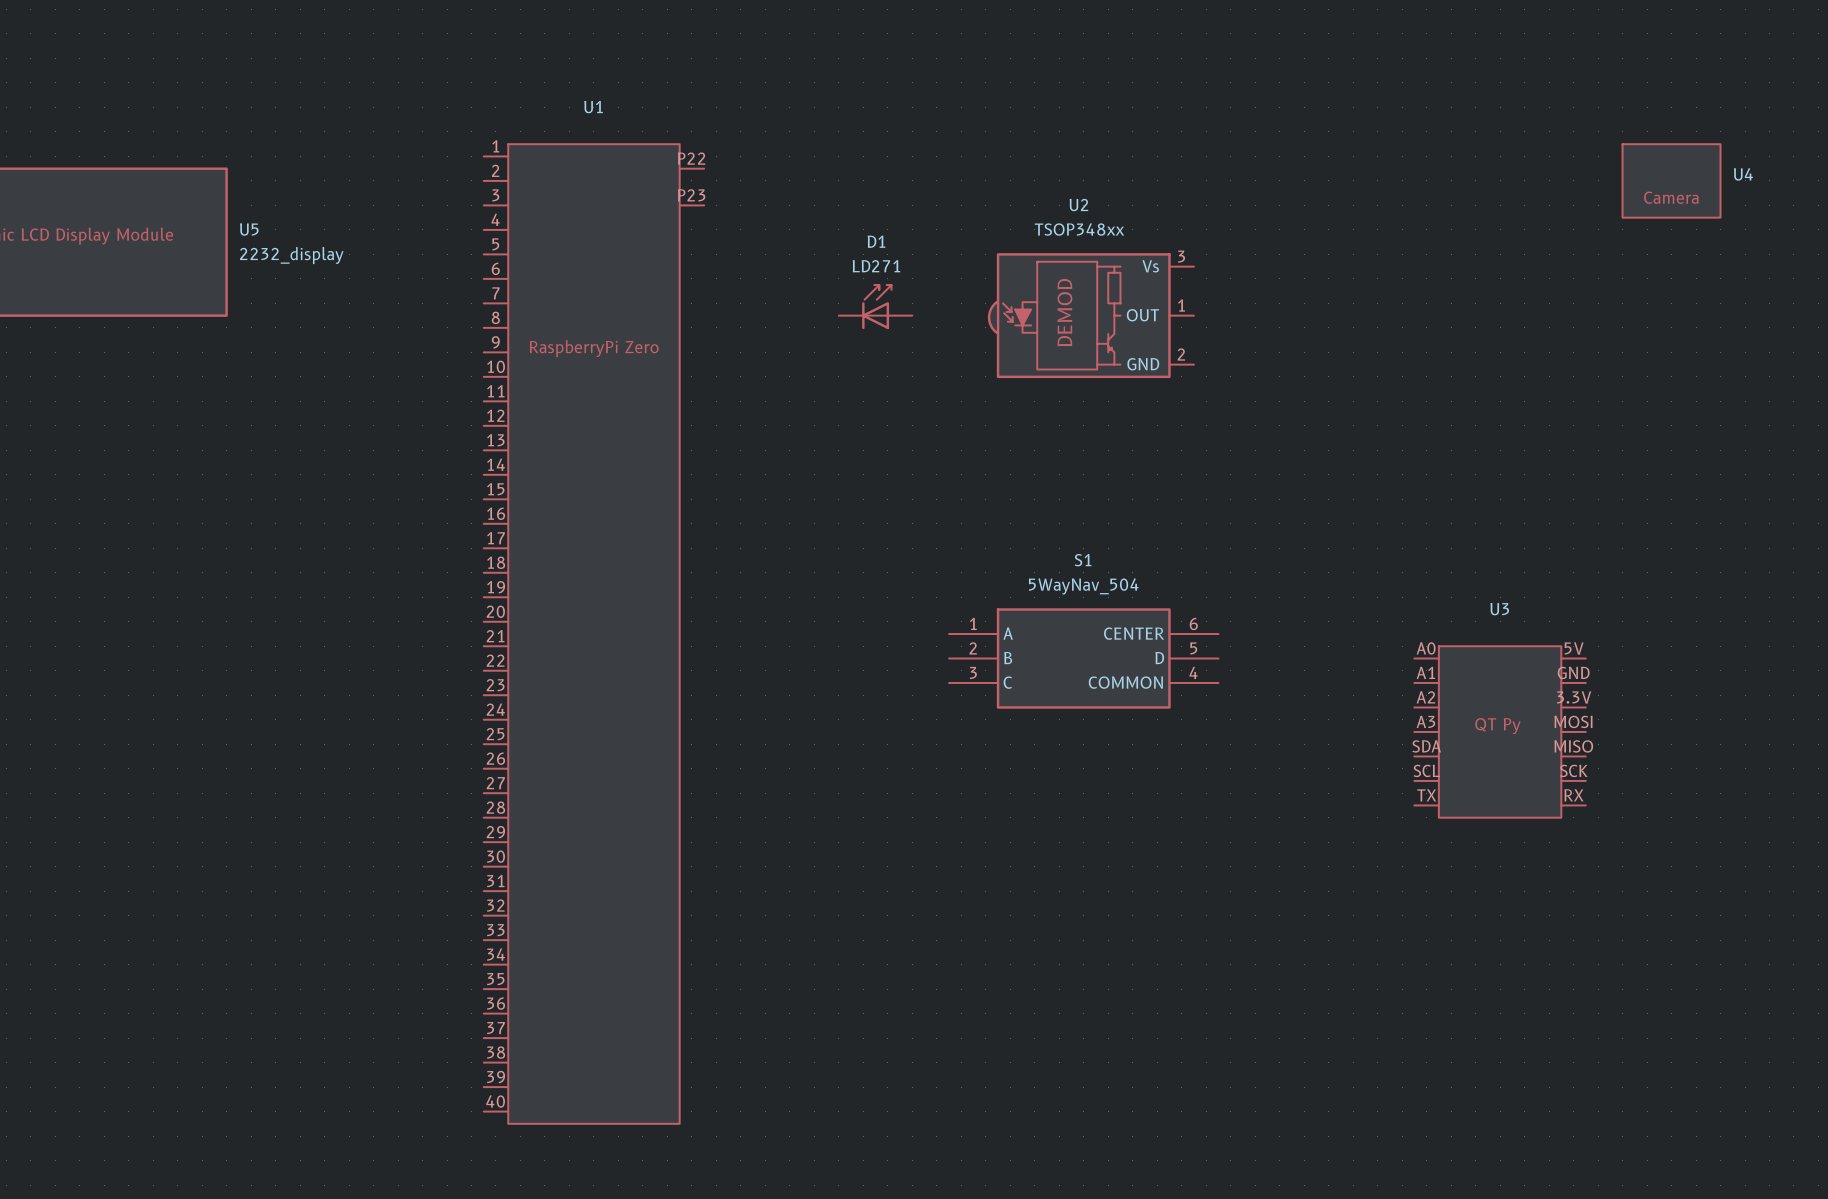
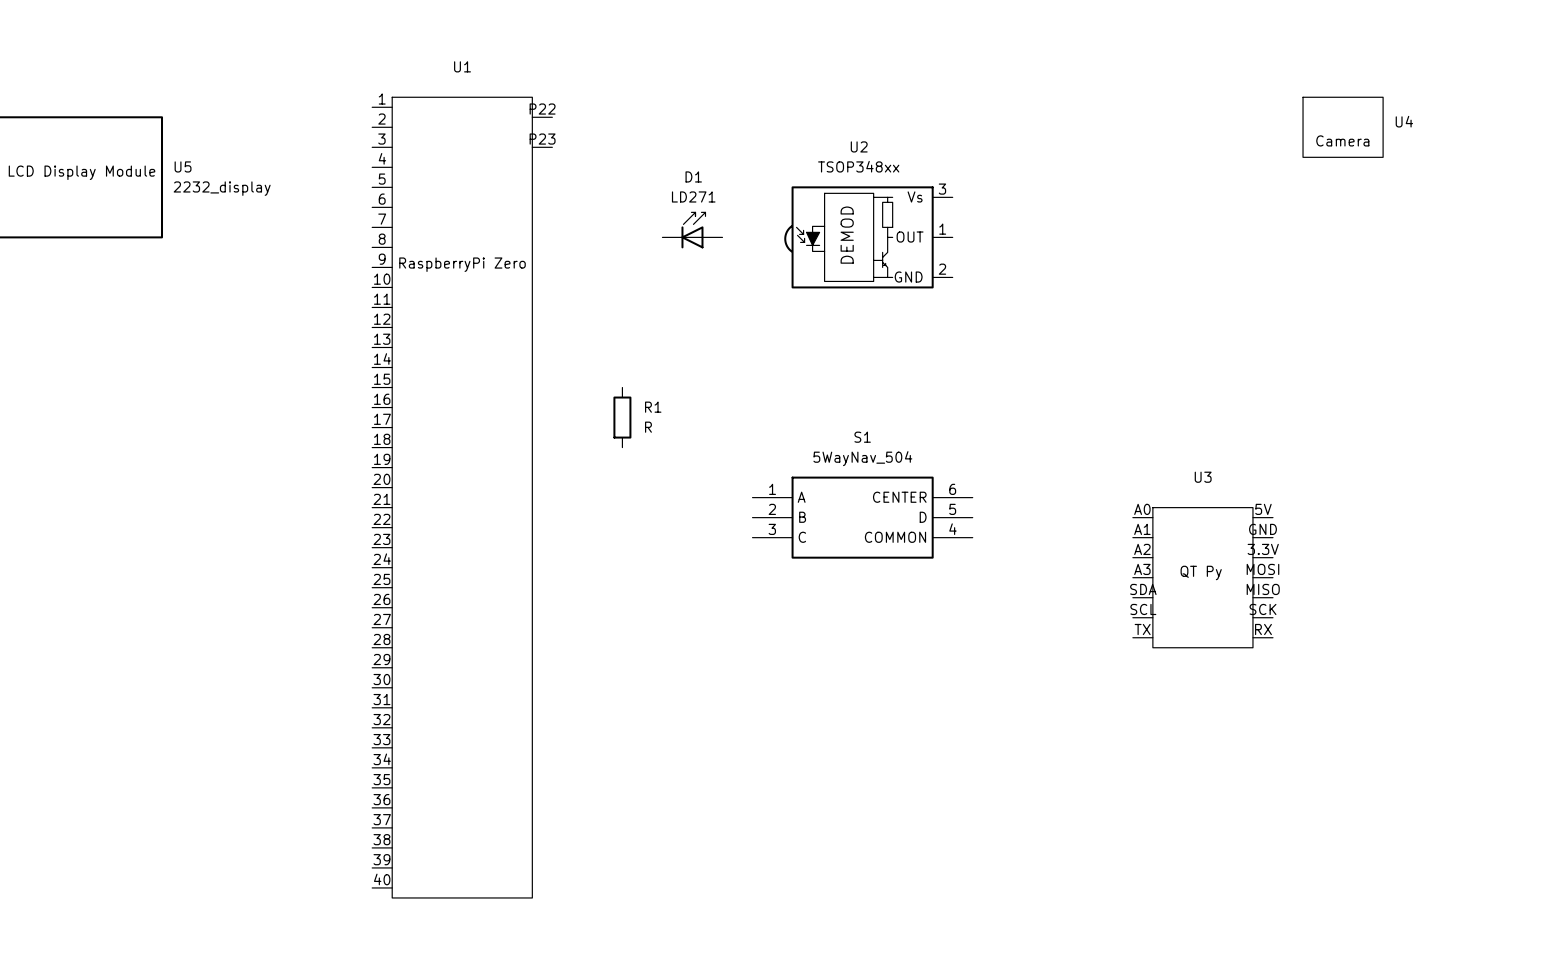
R1: none -> R (622, 417)

